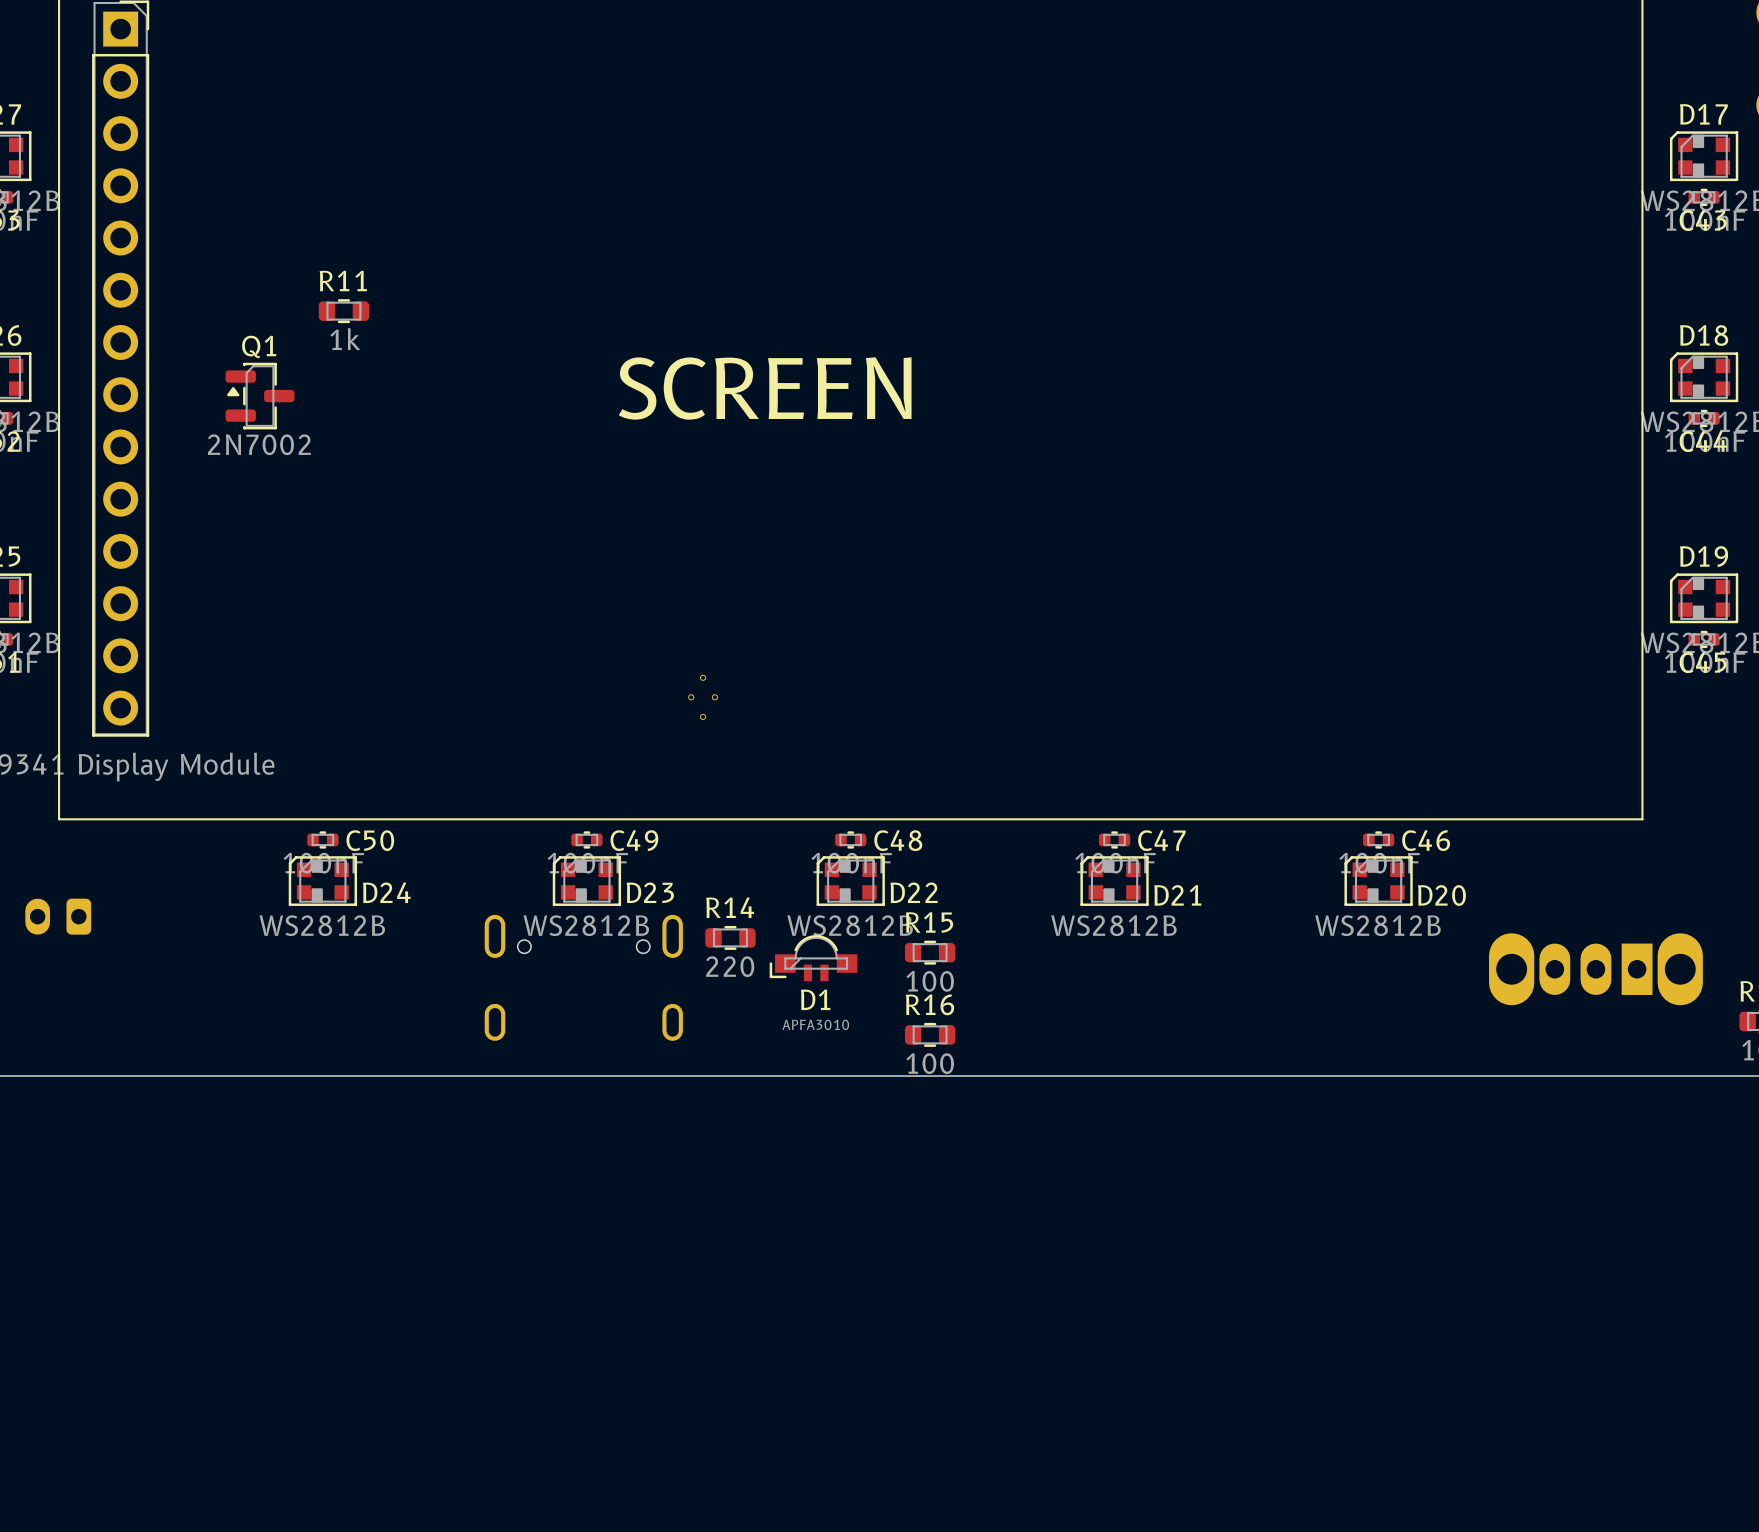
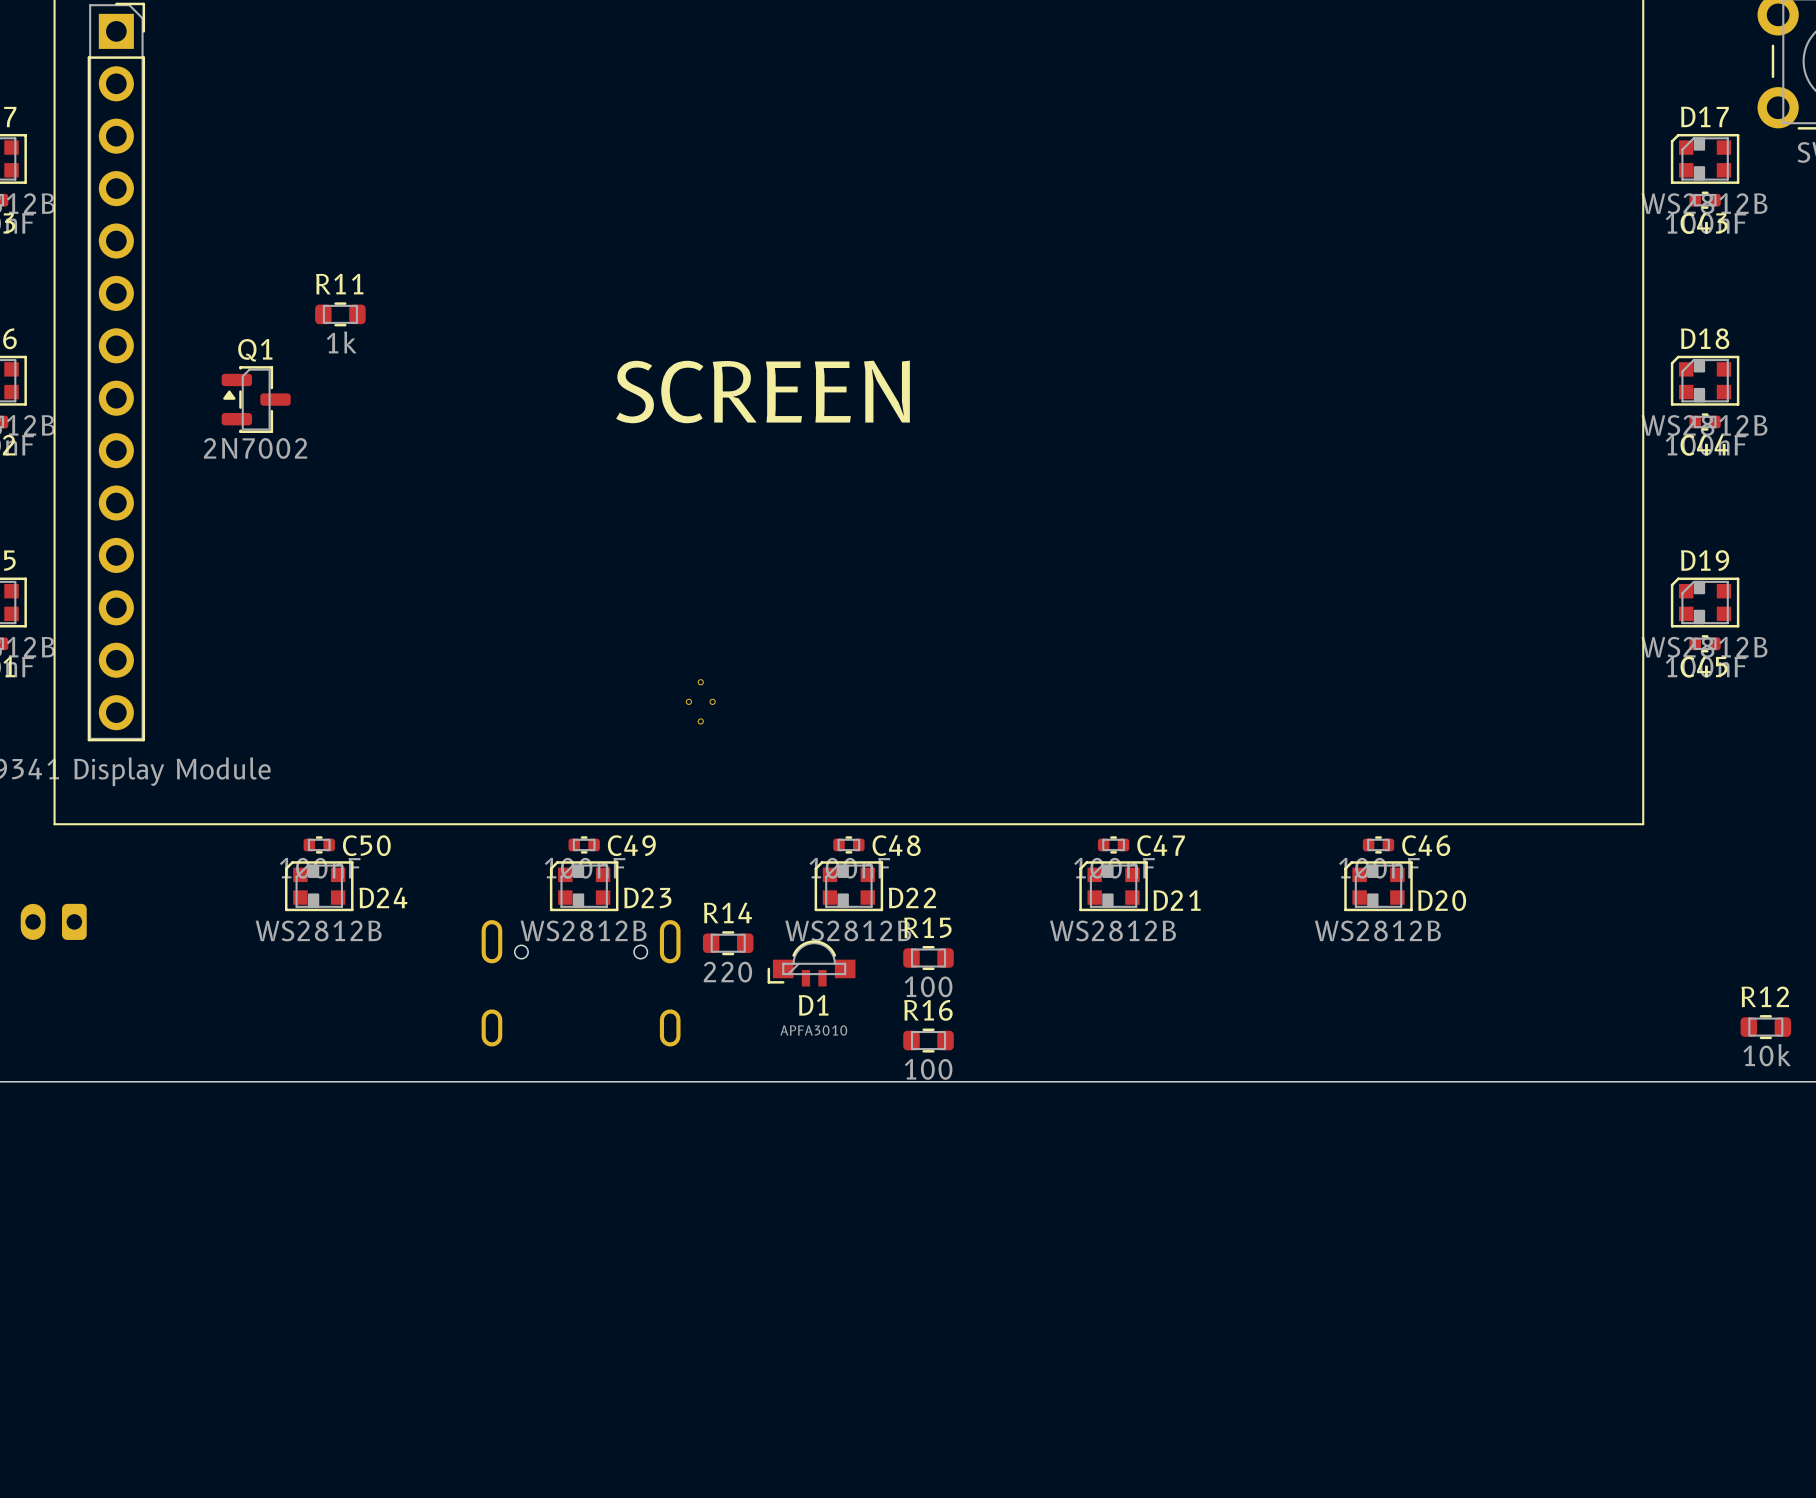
part: (1595, 969) -> none

